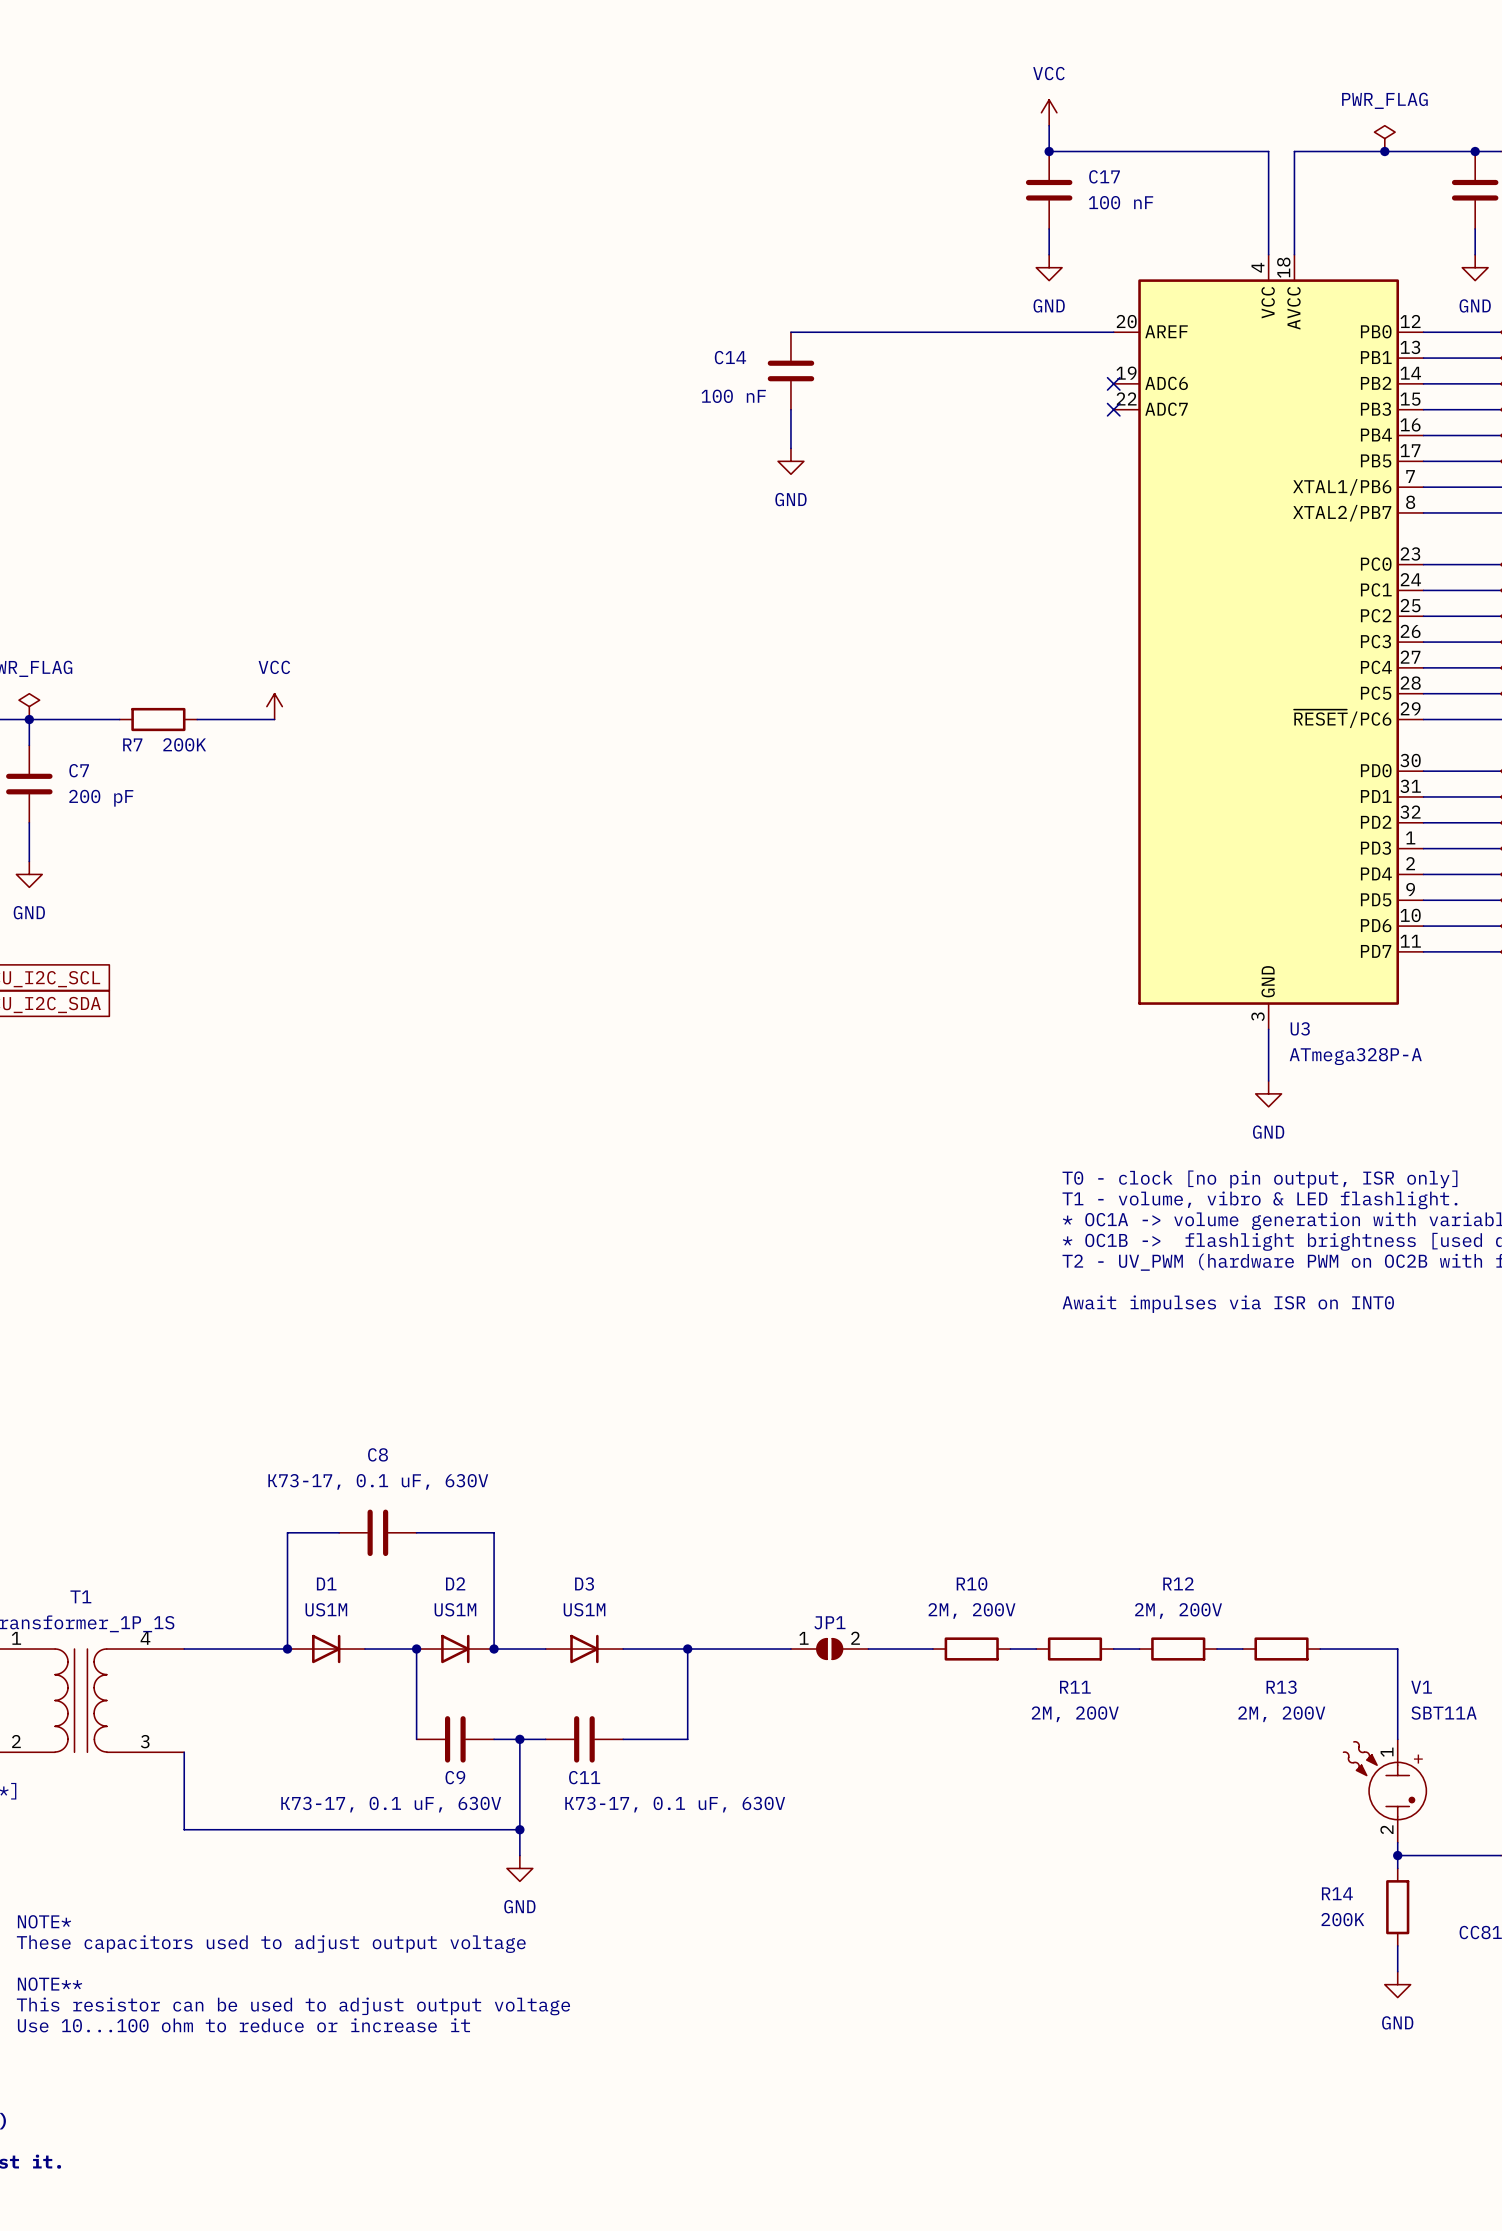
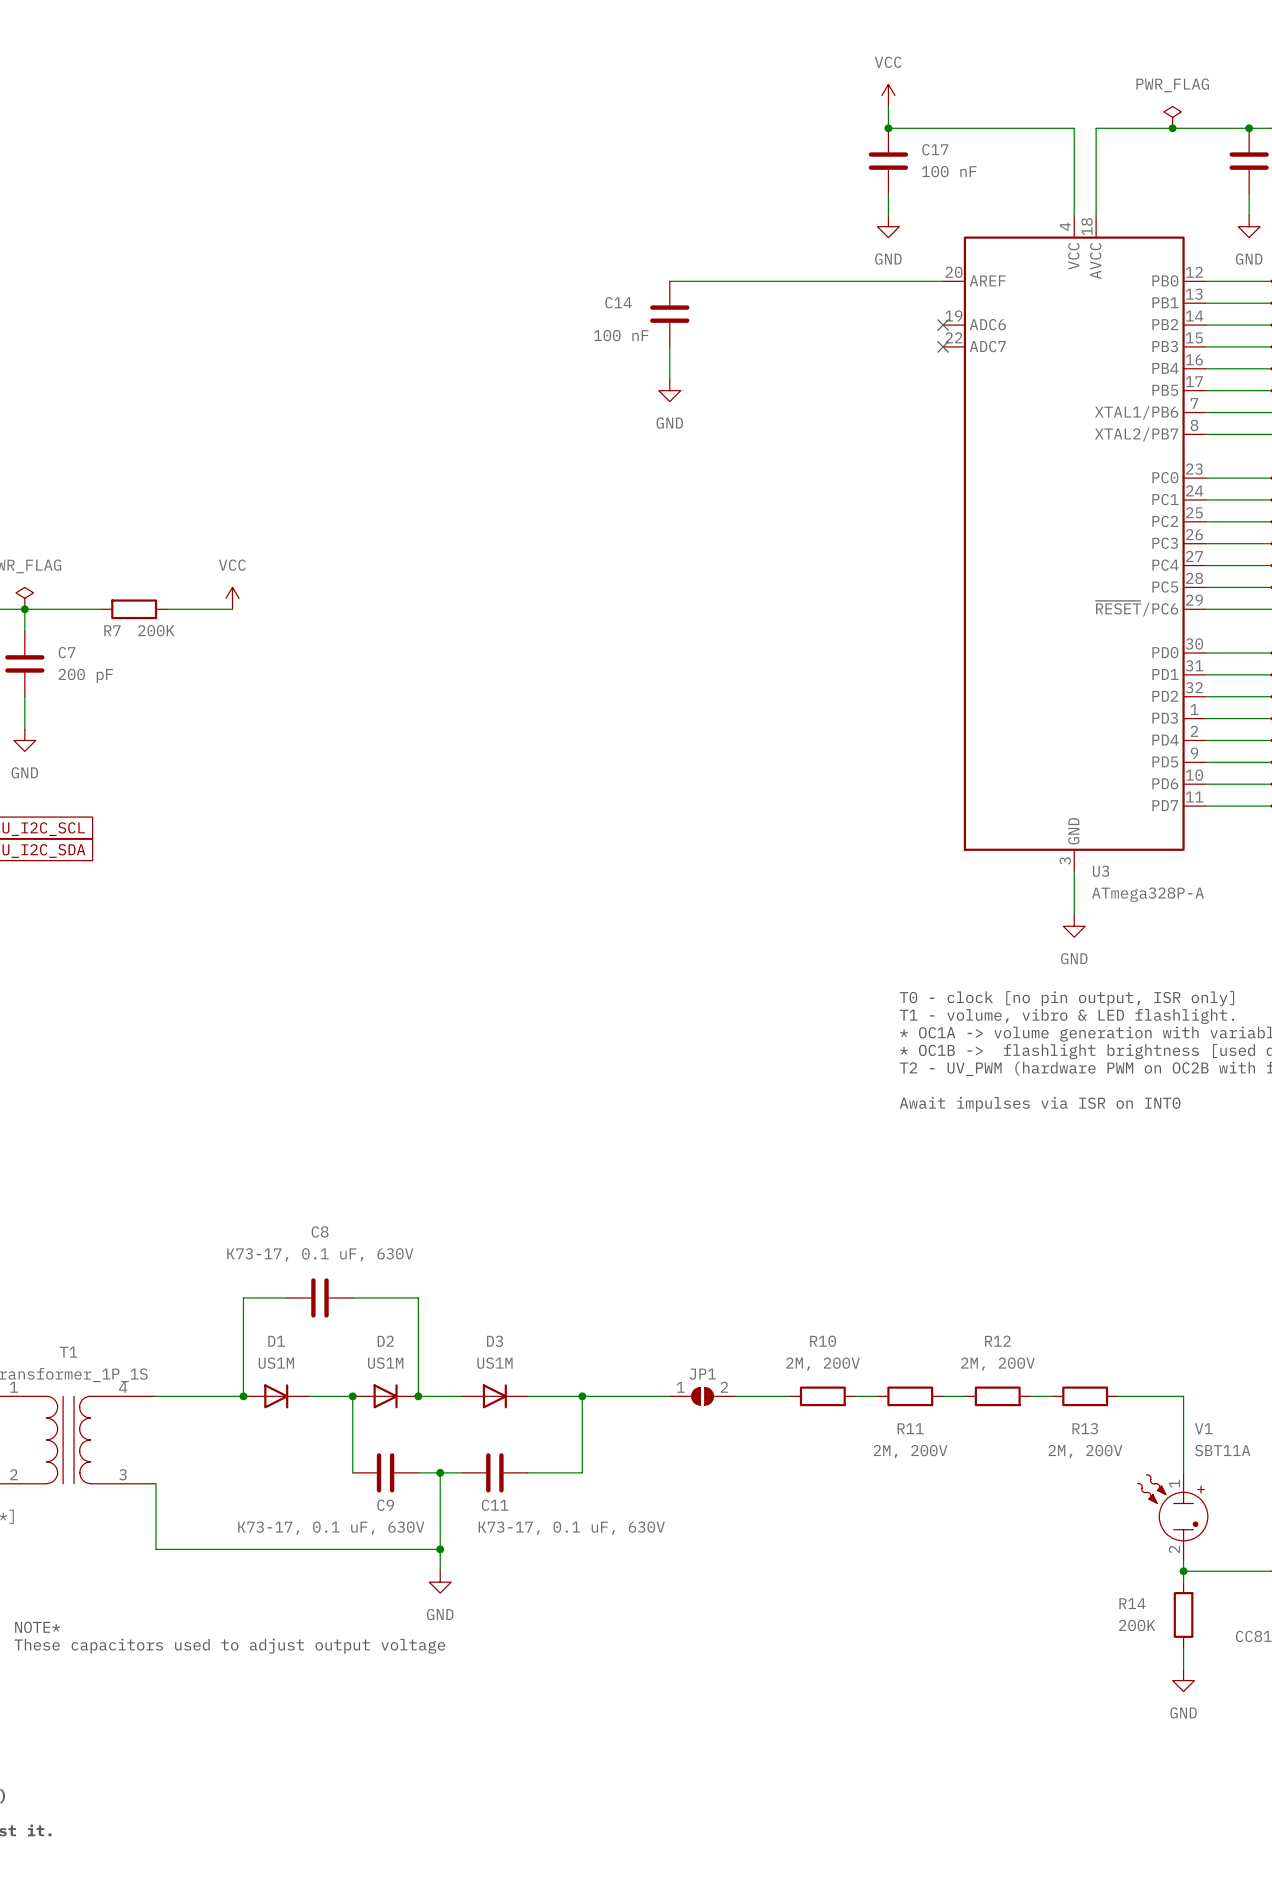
text: NOTE** (50, 1984) -> none
text: This resistor can be used to adjust output voltage (293, 2006) -> none
text: Use 10...100 ohm to reduce or increase it (243, 2025) -> none

